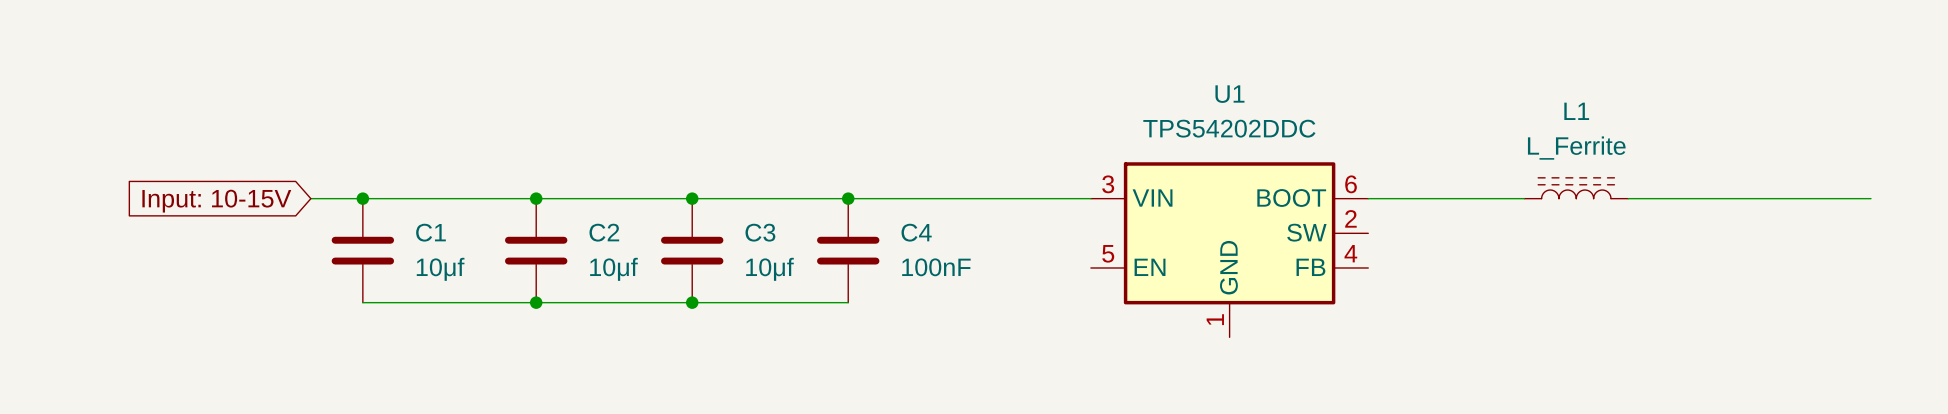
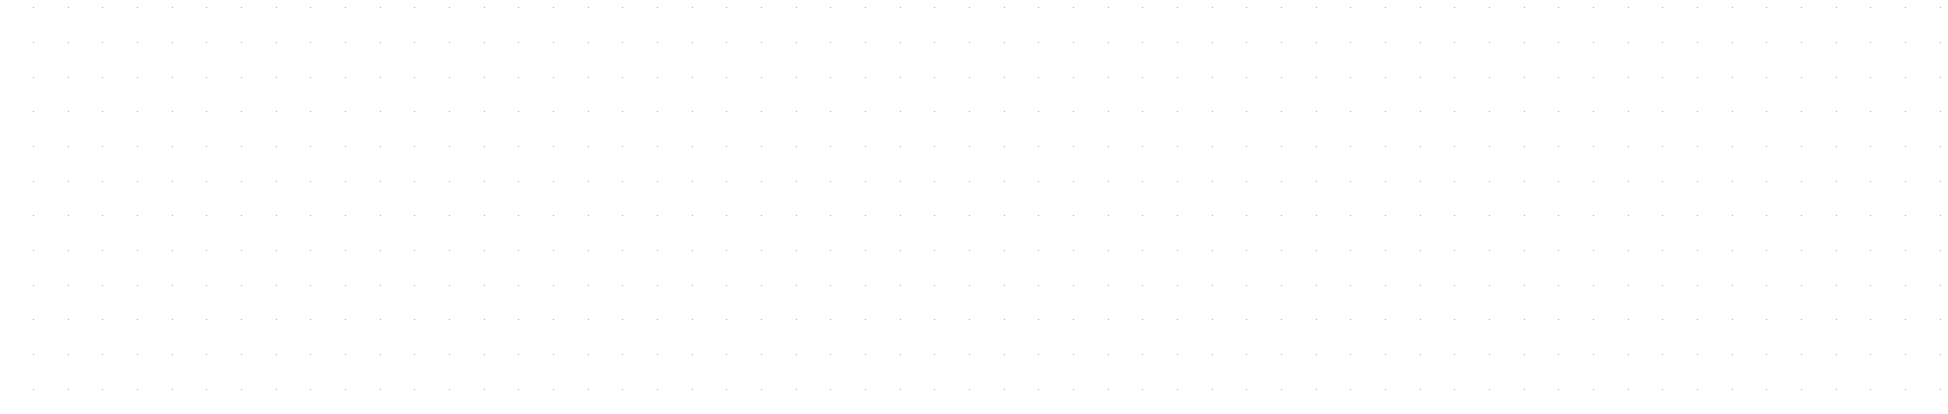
L1: L_Ferrite (1576, 188) -> none
wire: (310, 198) (1090, 198) -> none
junction: (362, 198) -> none
junction: (536, 198) -> none
junction: (692, 198) -> none
junction: (848, 198) -> none
wire: (1368, 198) (1524, 198) -> none
wire: (1628, 198) (1870, 198) -> none
global label: Input: 10-15V (216, 201) -> none
U1: TPS54202DDC (1229, 249) -> none
C1: 10μf (362, 250) -> none
C2: 10μf (536, 250) -> none
C3: 10μf (692, 250) -> none
C4: 100nF (848, 250) -> none
wire: (362, 302) (848, 302) -> none
junction: (536, 302) -> none
junction: (692, 302) -> none

